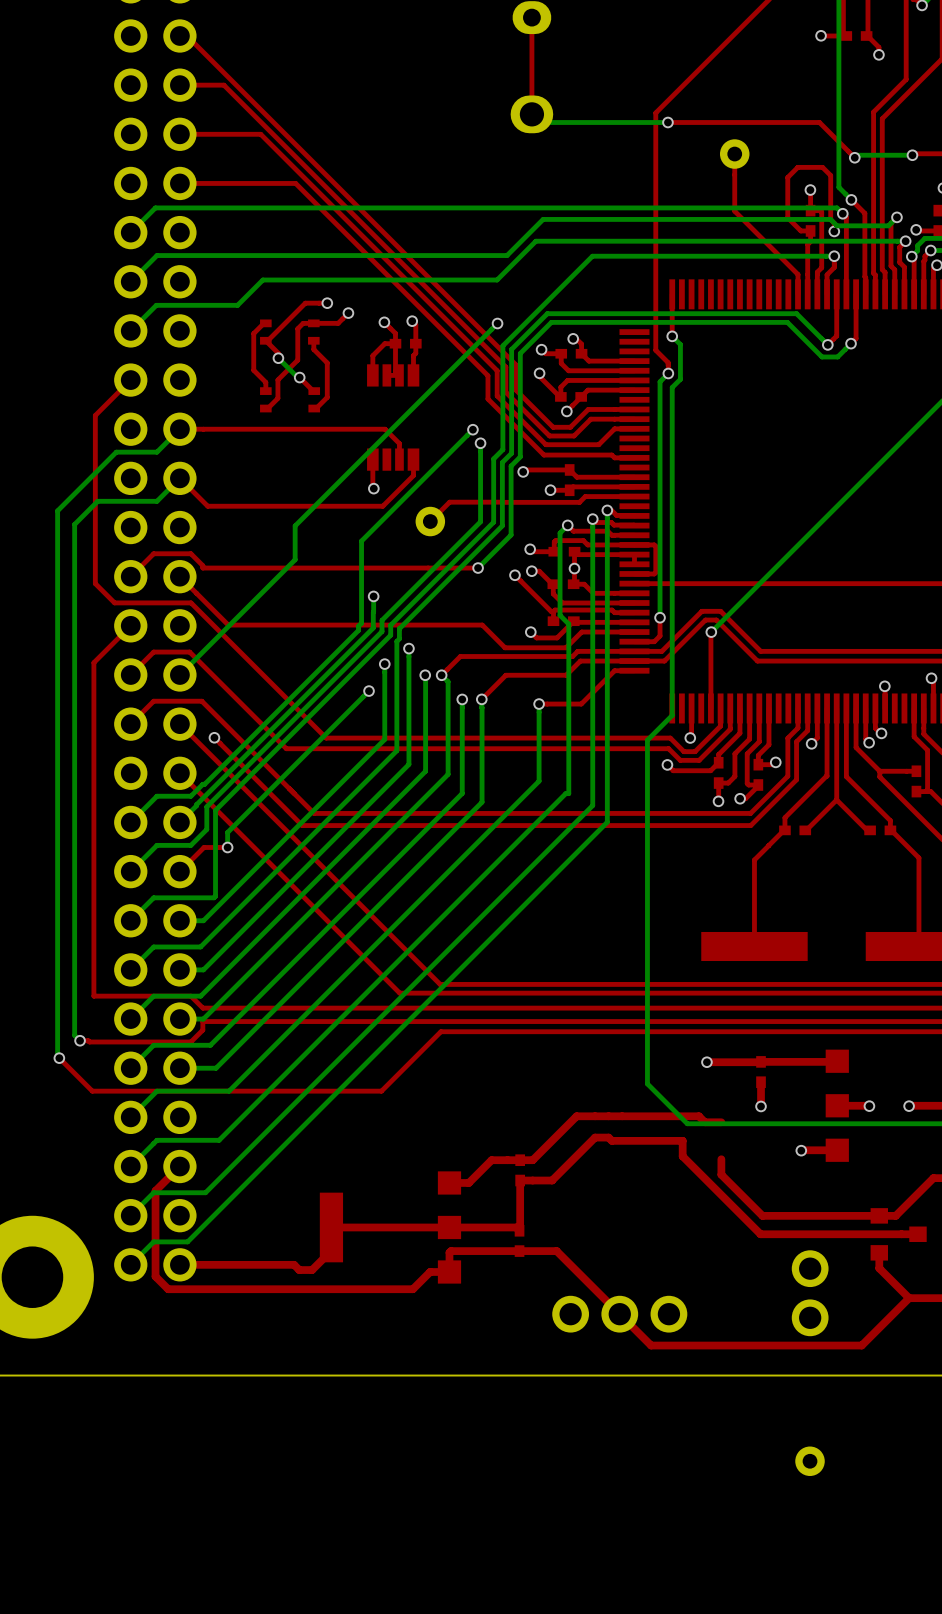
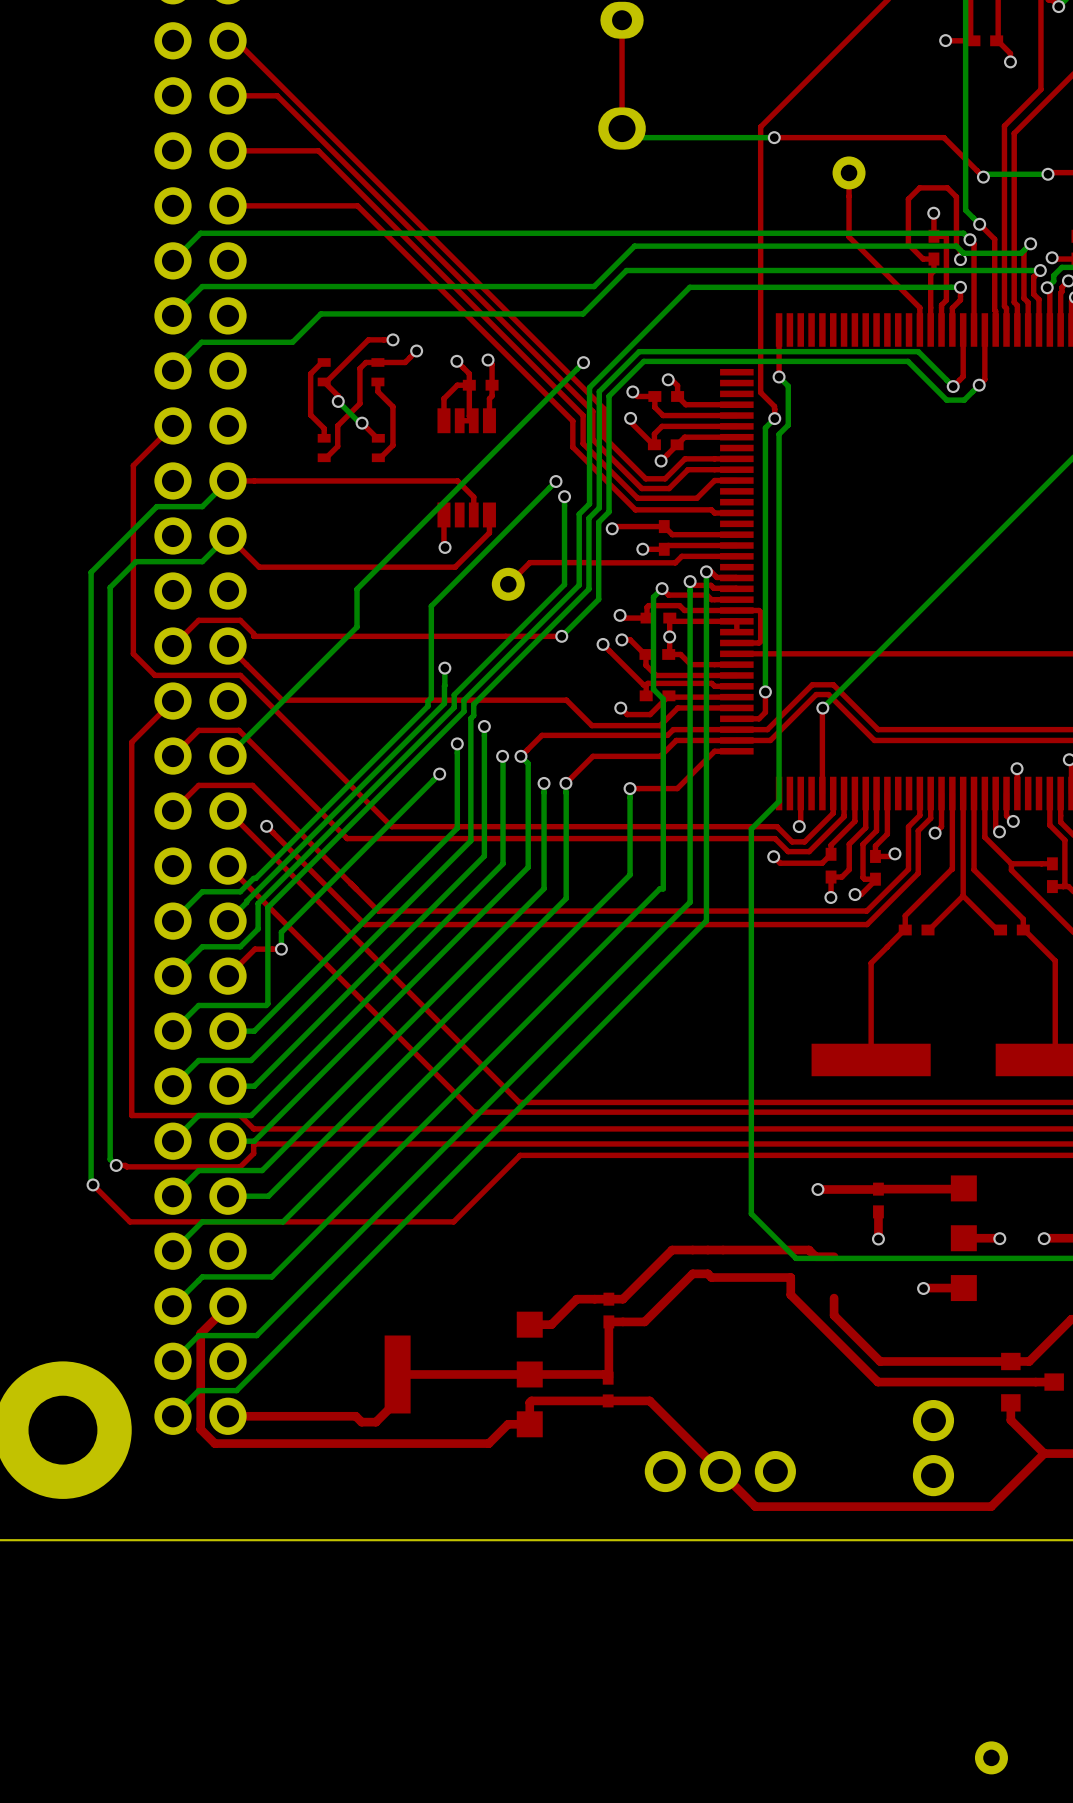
part position: (810, 1461) -> (991, 1757)

